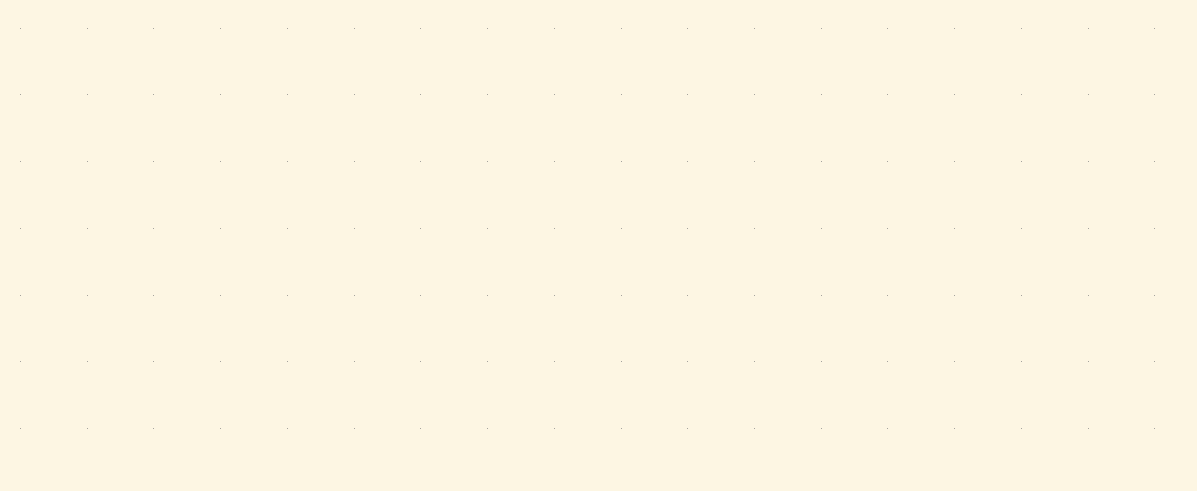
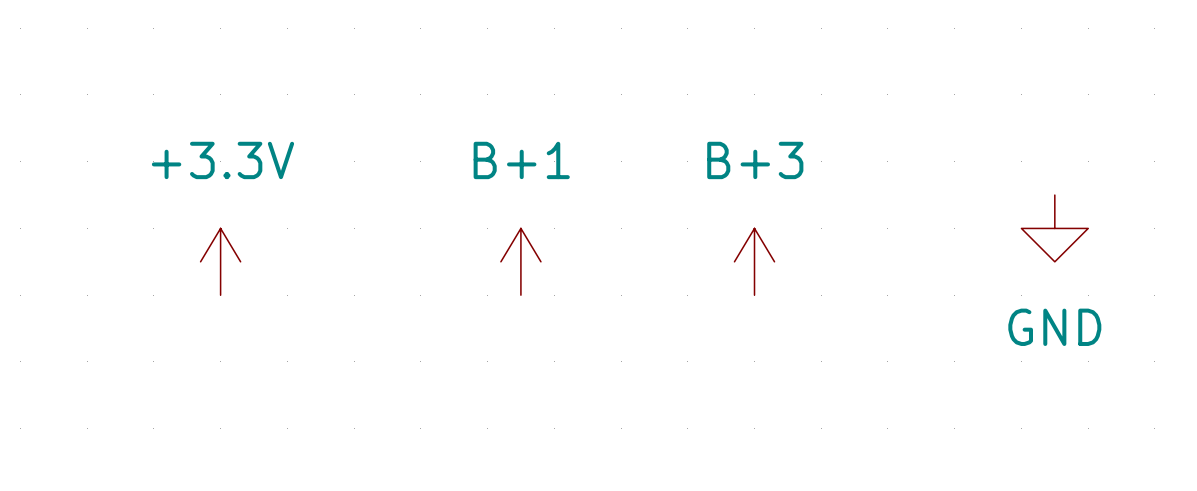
power symbol: none -> GND (1054, 228)
power symbol: none -> +3.3V (220, 261)
power symbol: none -> B+1 (520, 261)
power symbol: none -> B+3 (754, 261)

